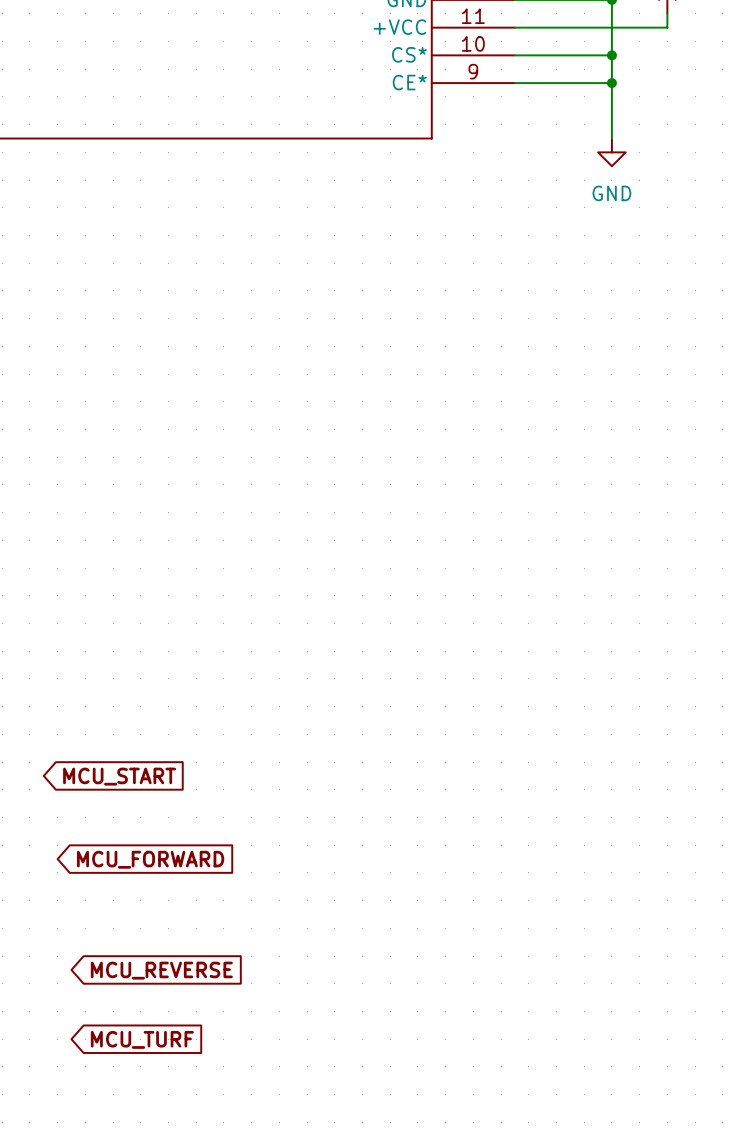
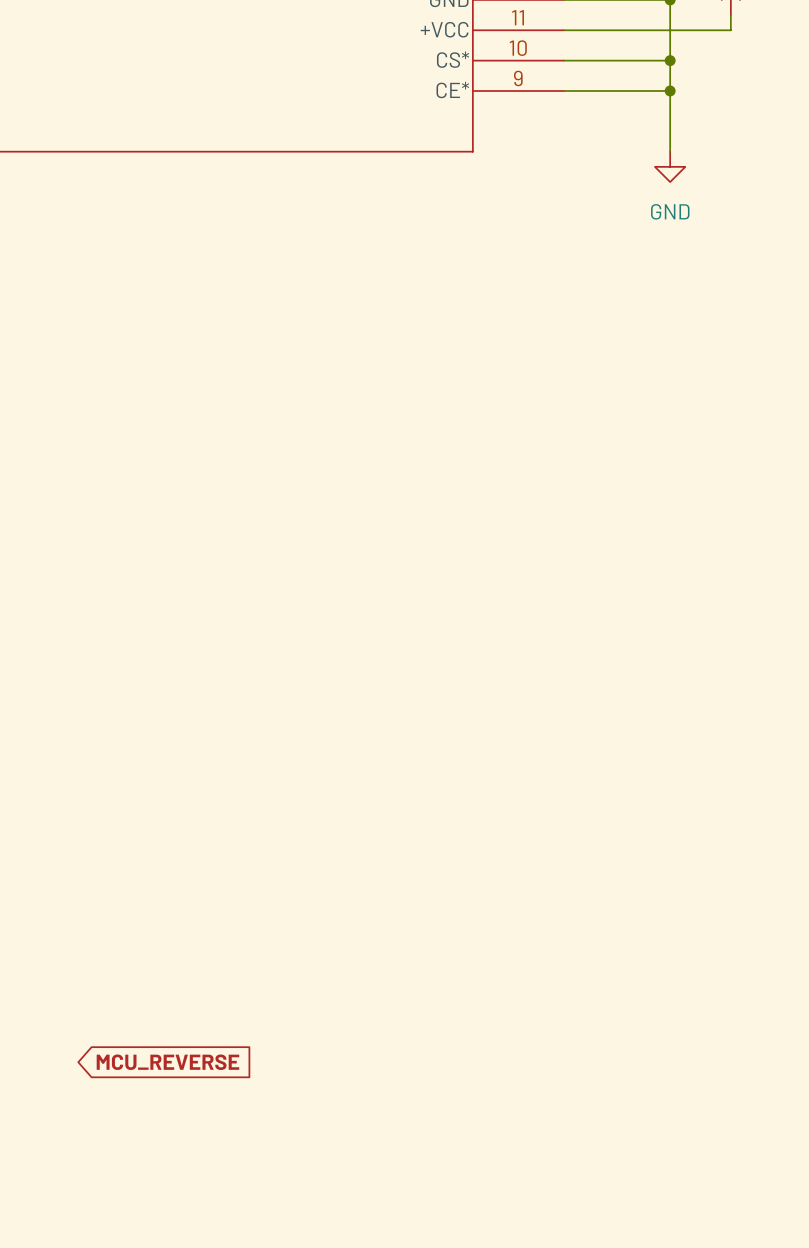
global label: MCU_START (119, 776) -> none
global label: MCU_FORWARD (150, 859) -> none
global label: MCU_TURF (142, 1039) -> none

